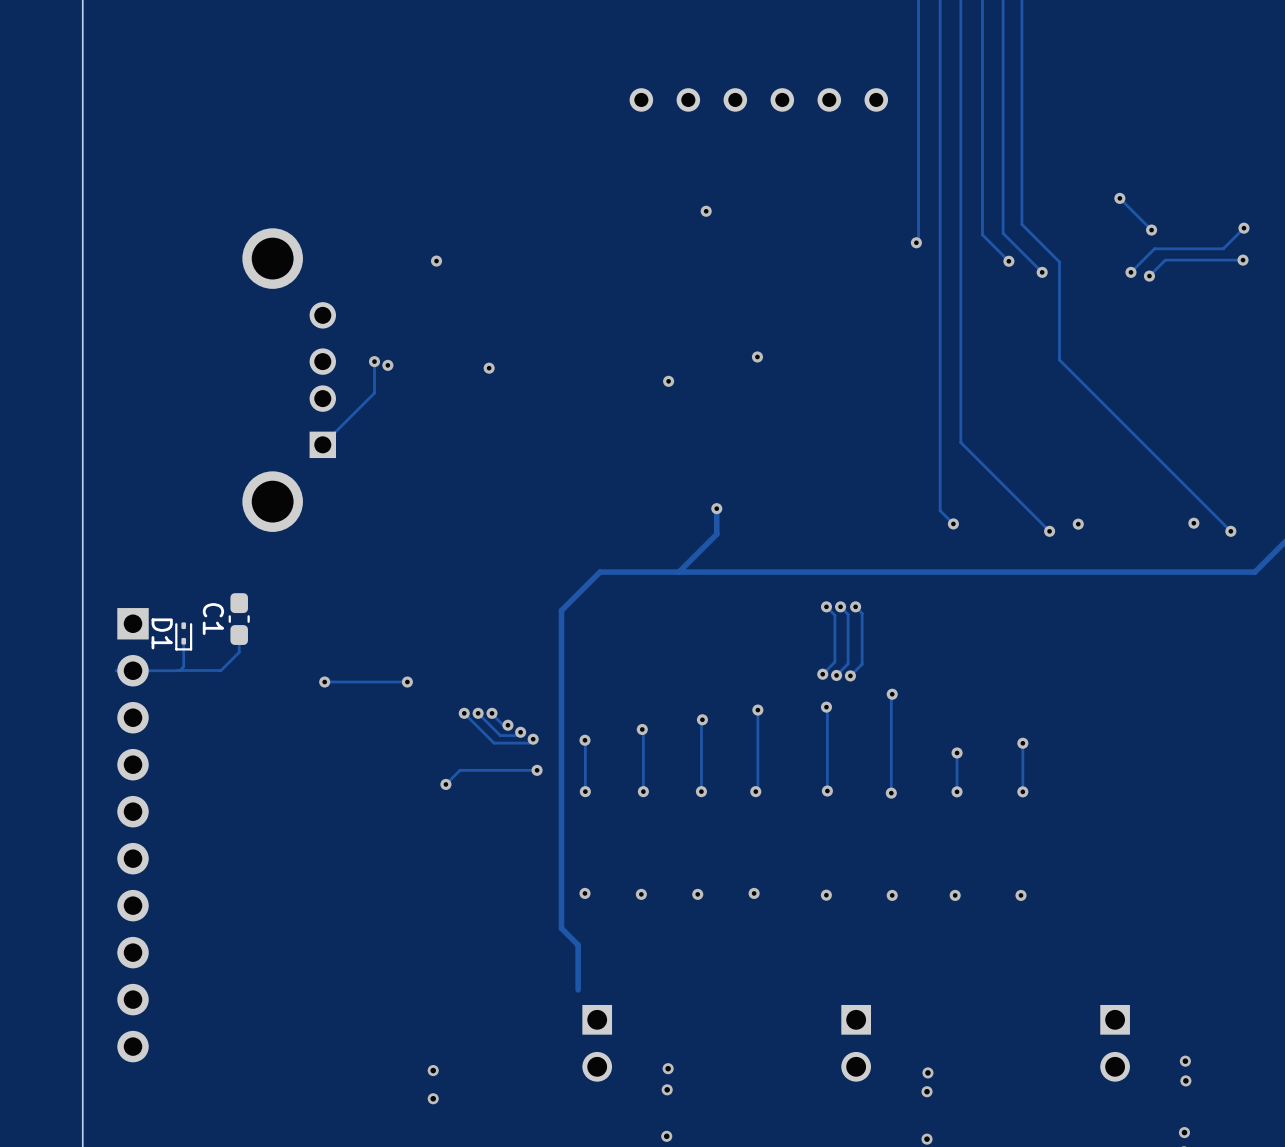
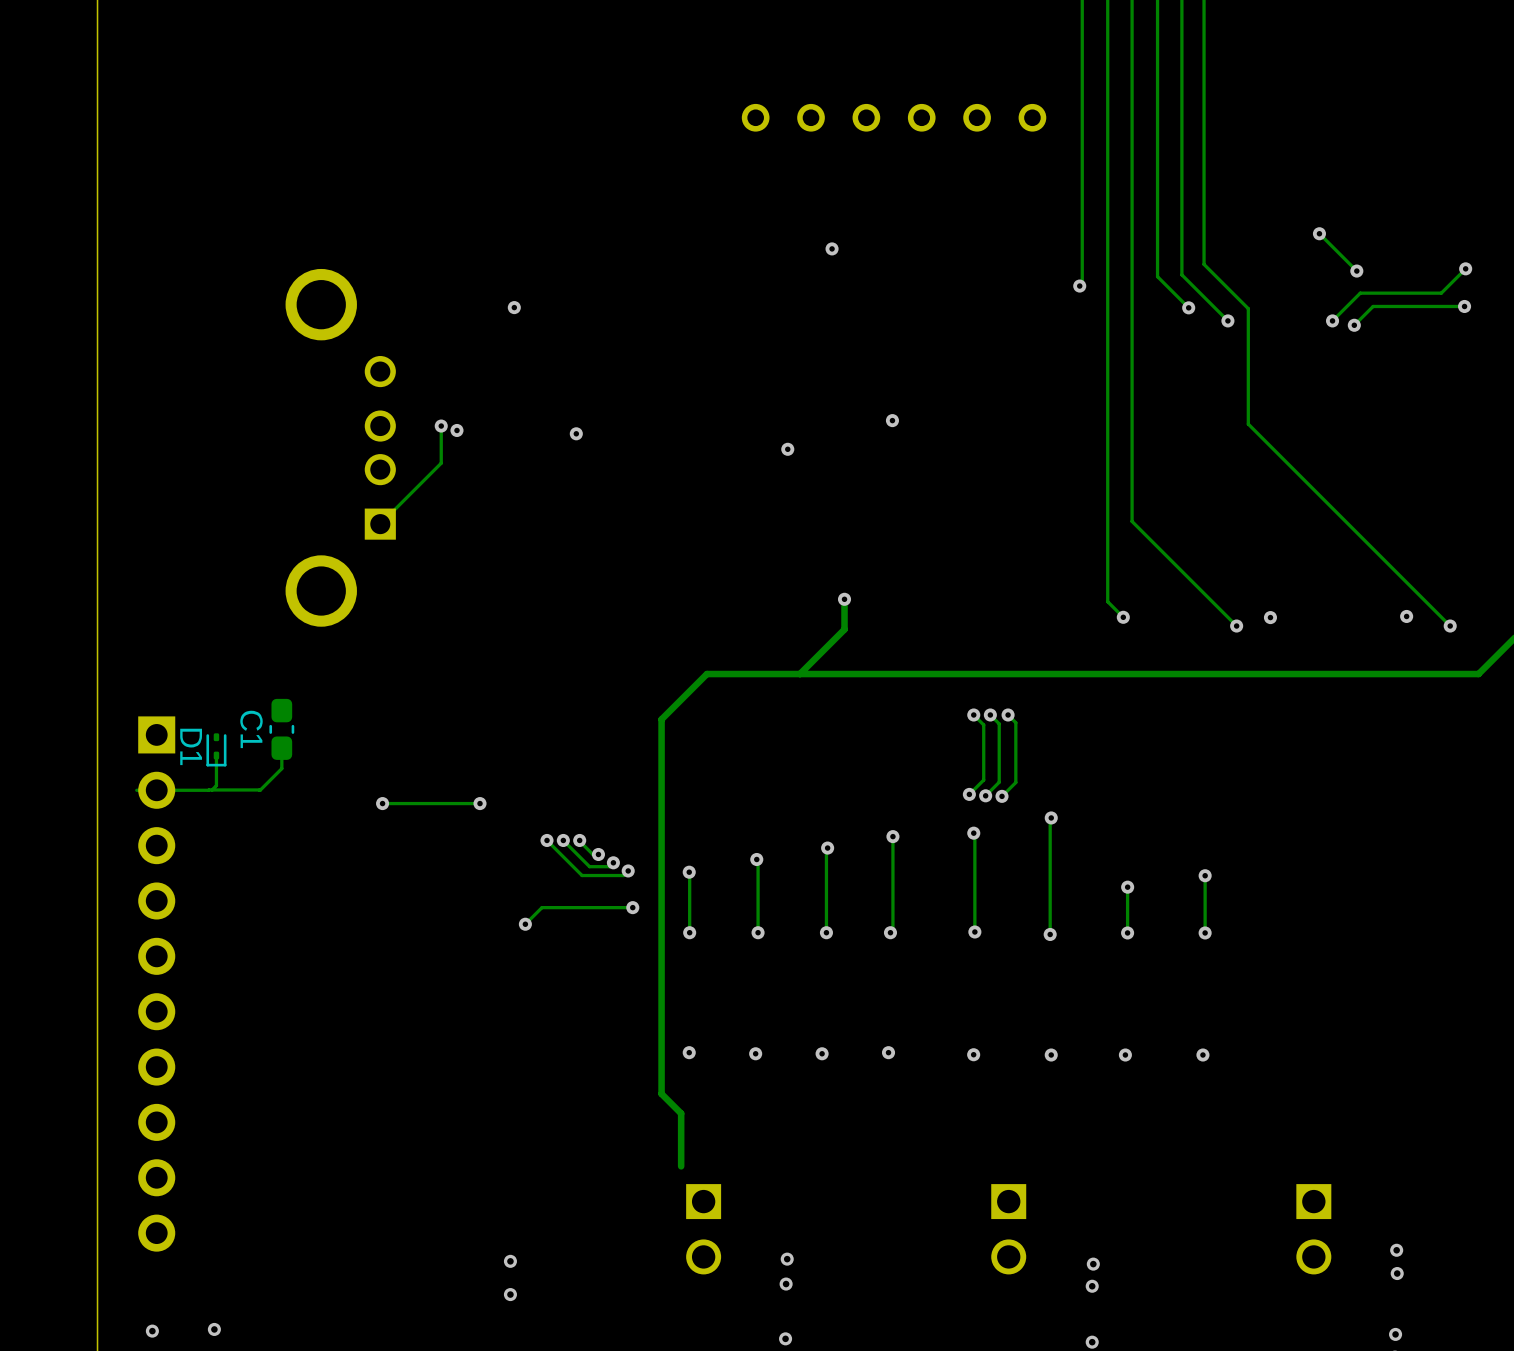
via: none -> (214, 1329)
via: none -> (152, 1331)

